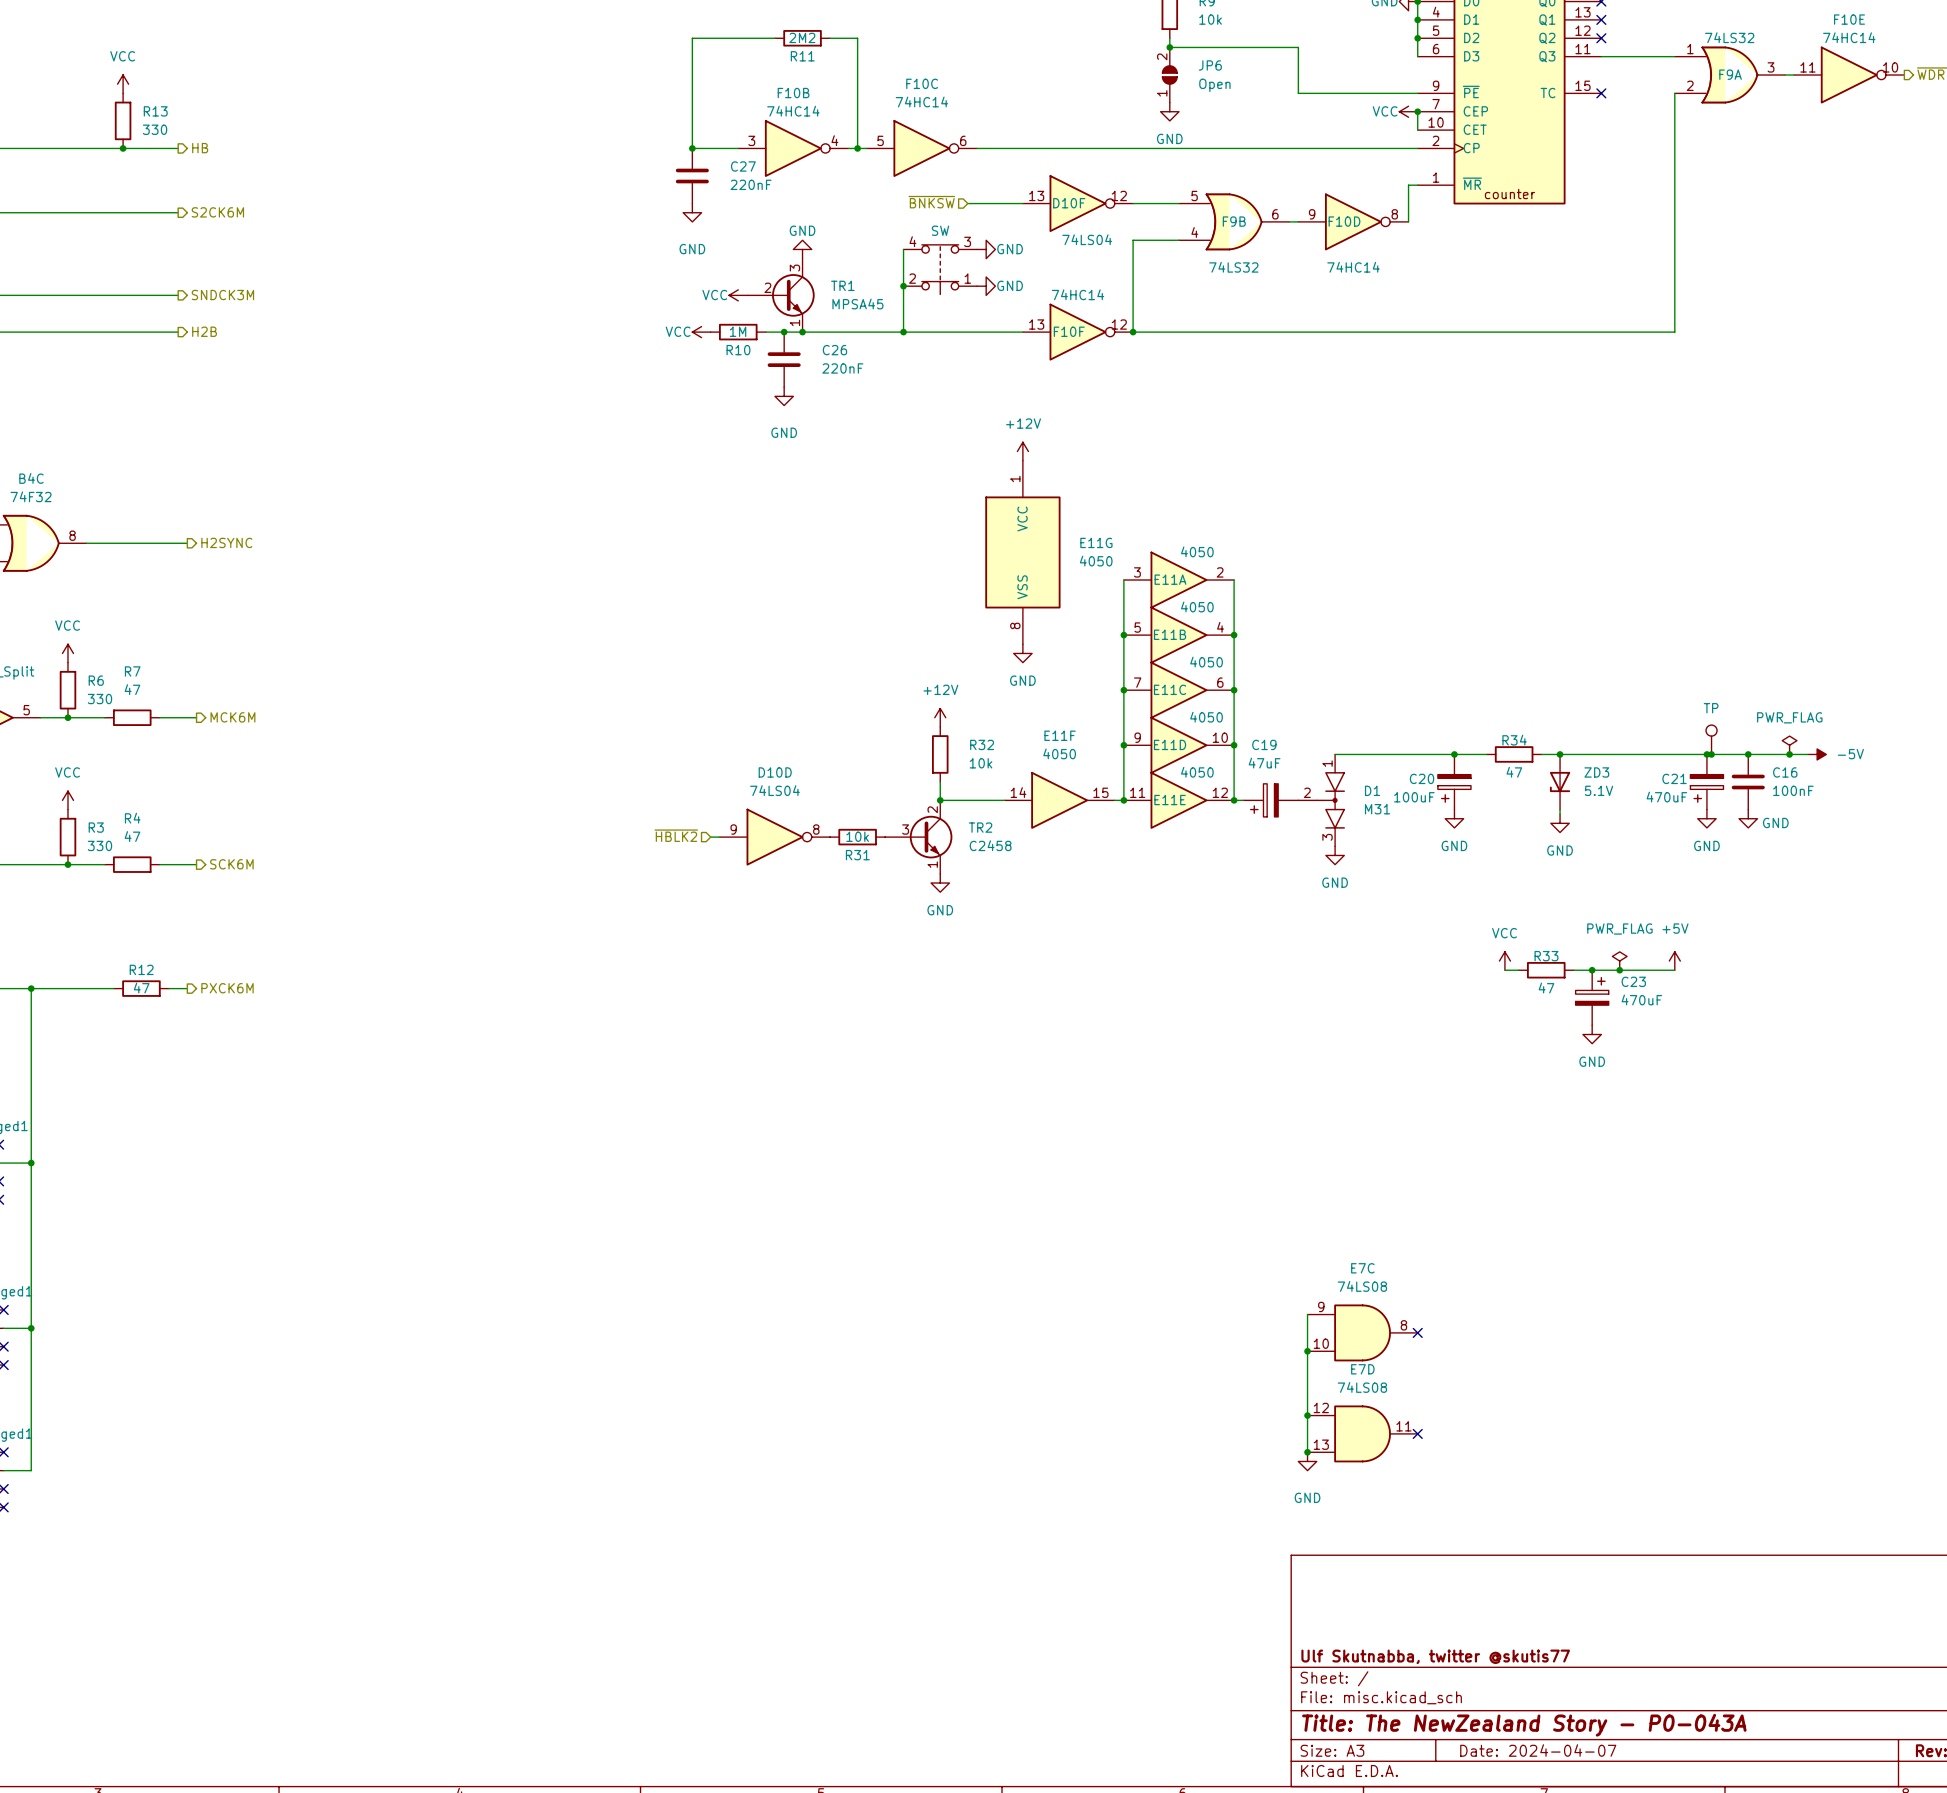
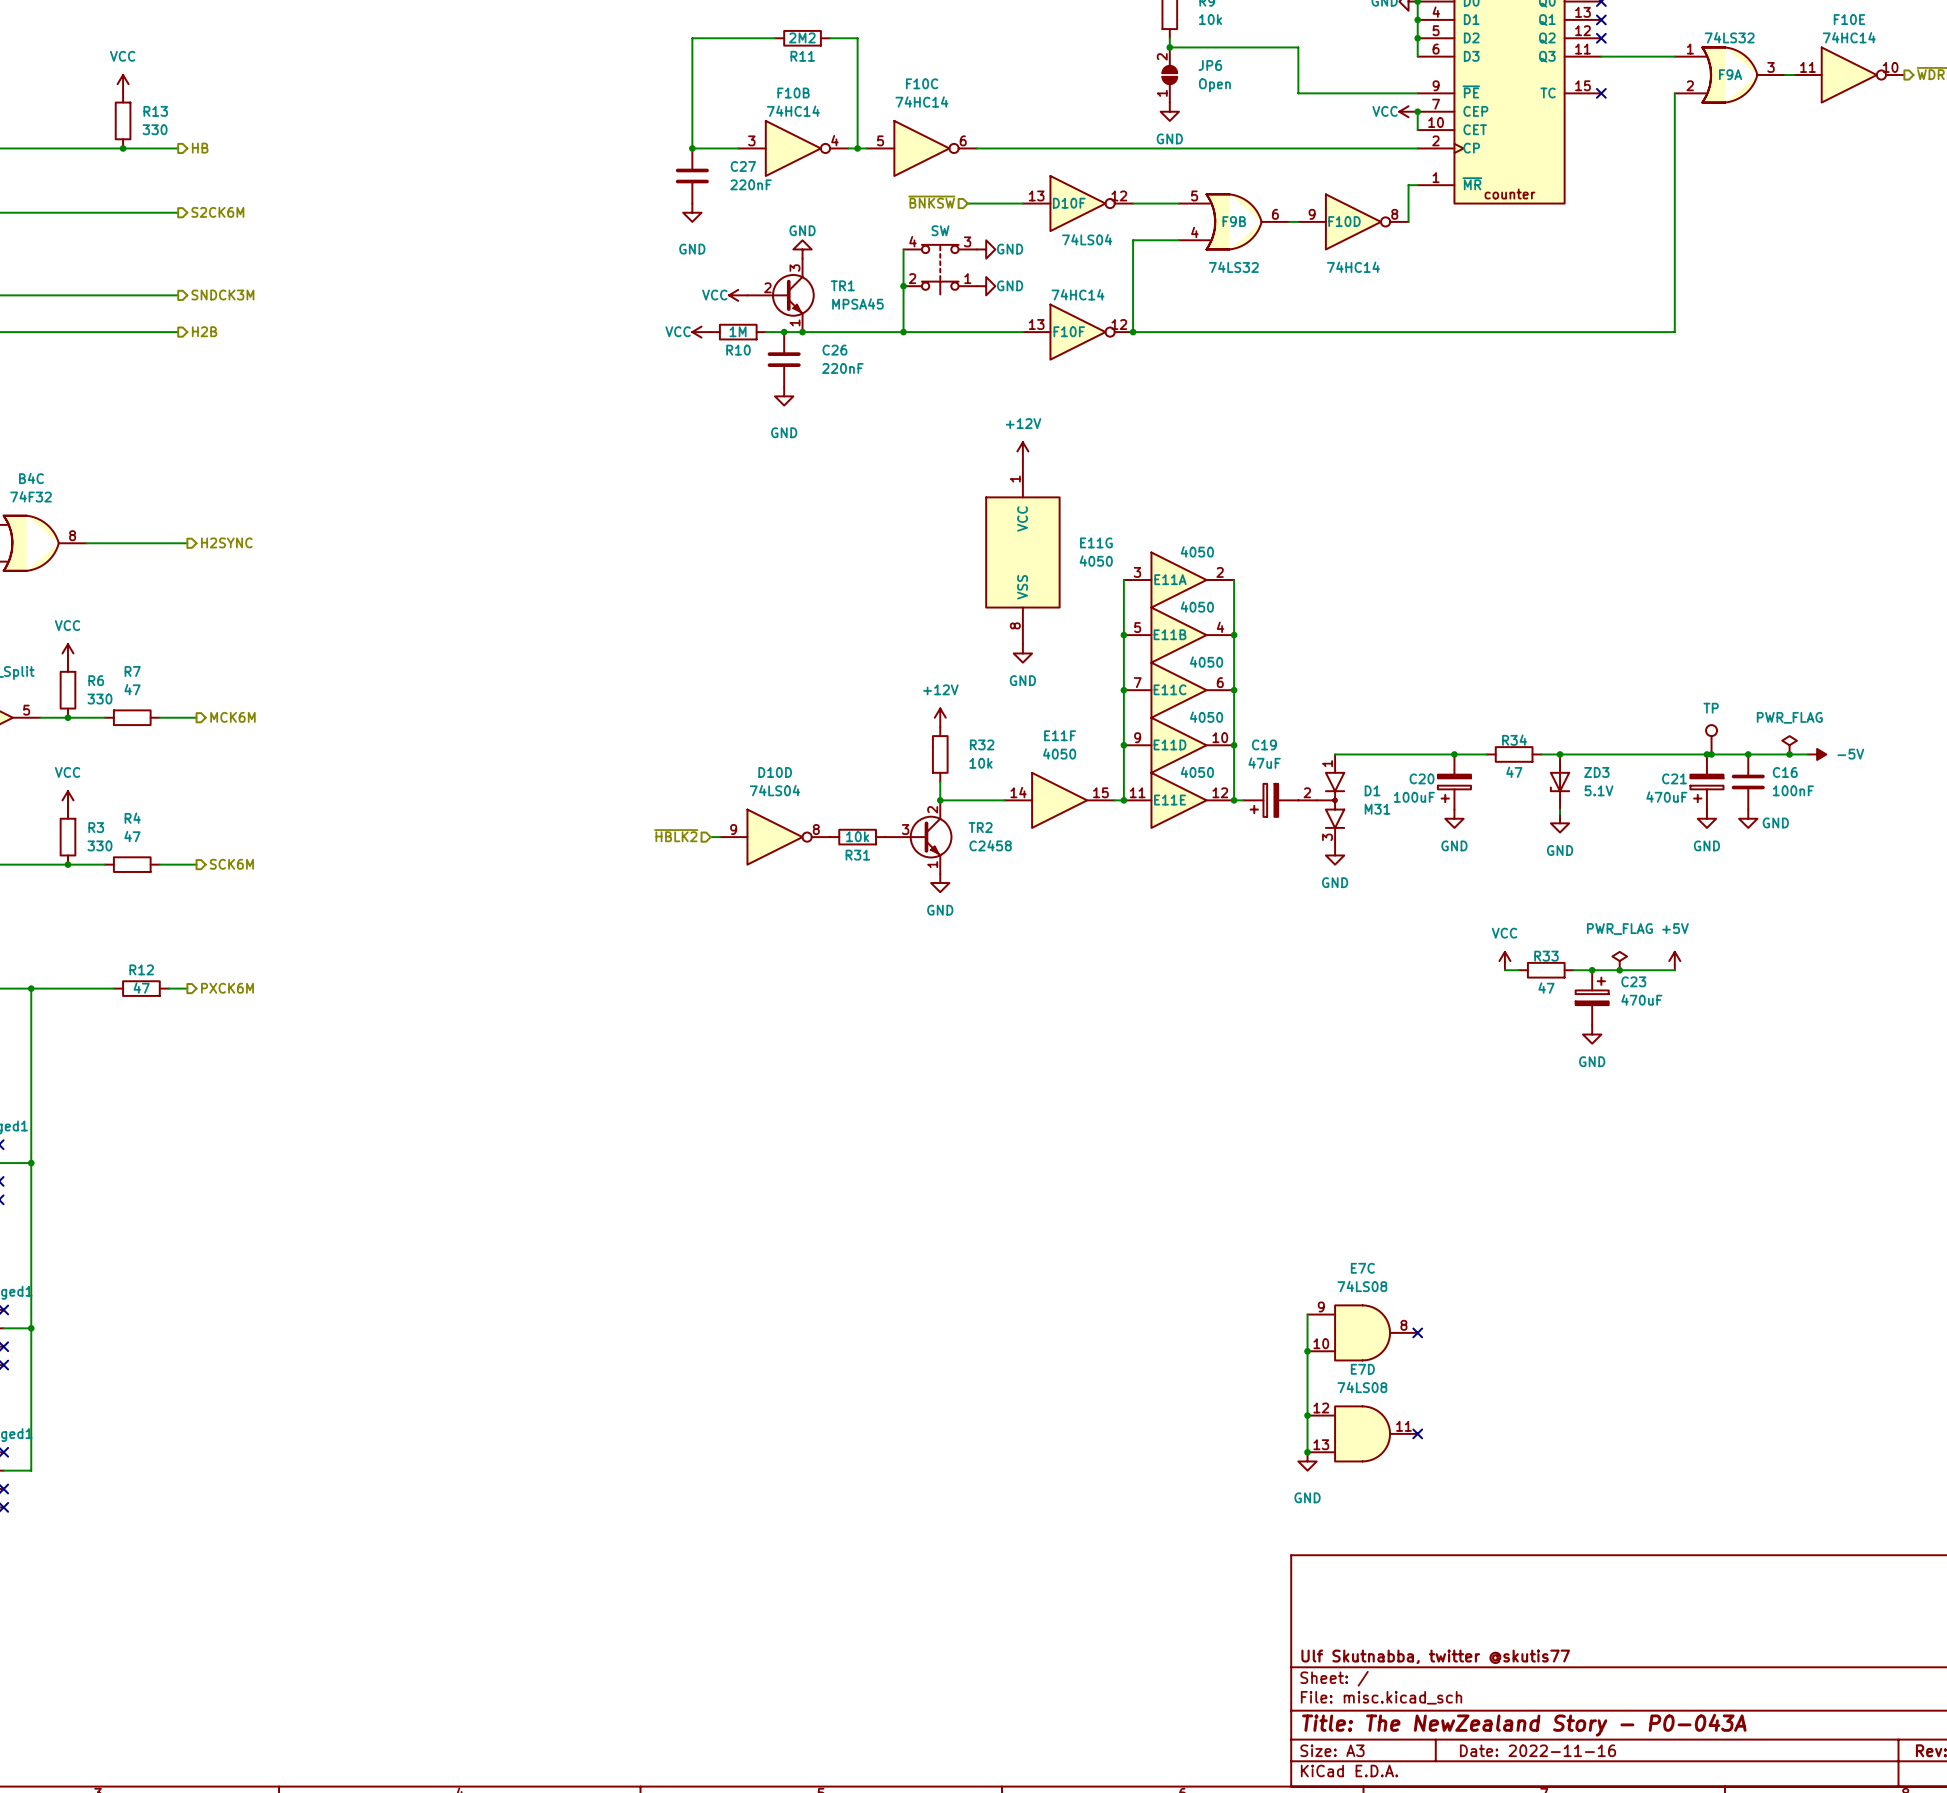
title block: Date: 2024-04-07 (1538, 1750) -> Date: 2022-11-16 (1537, 1750)

